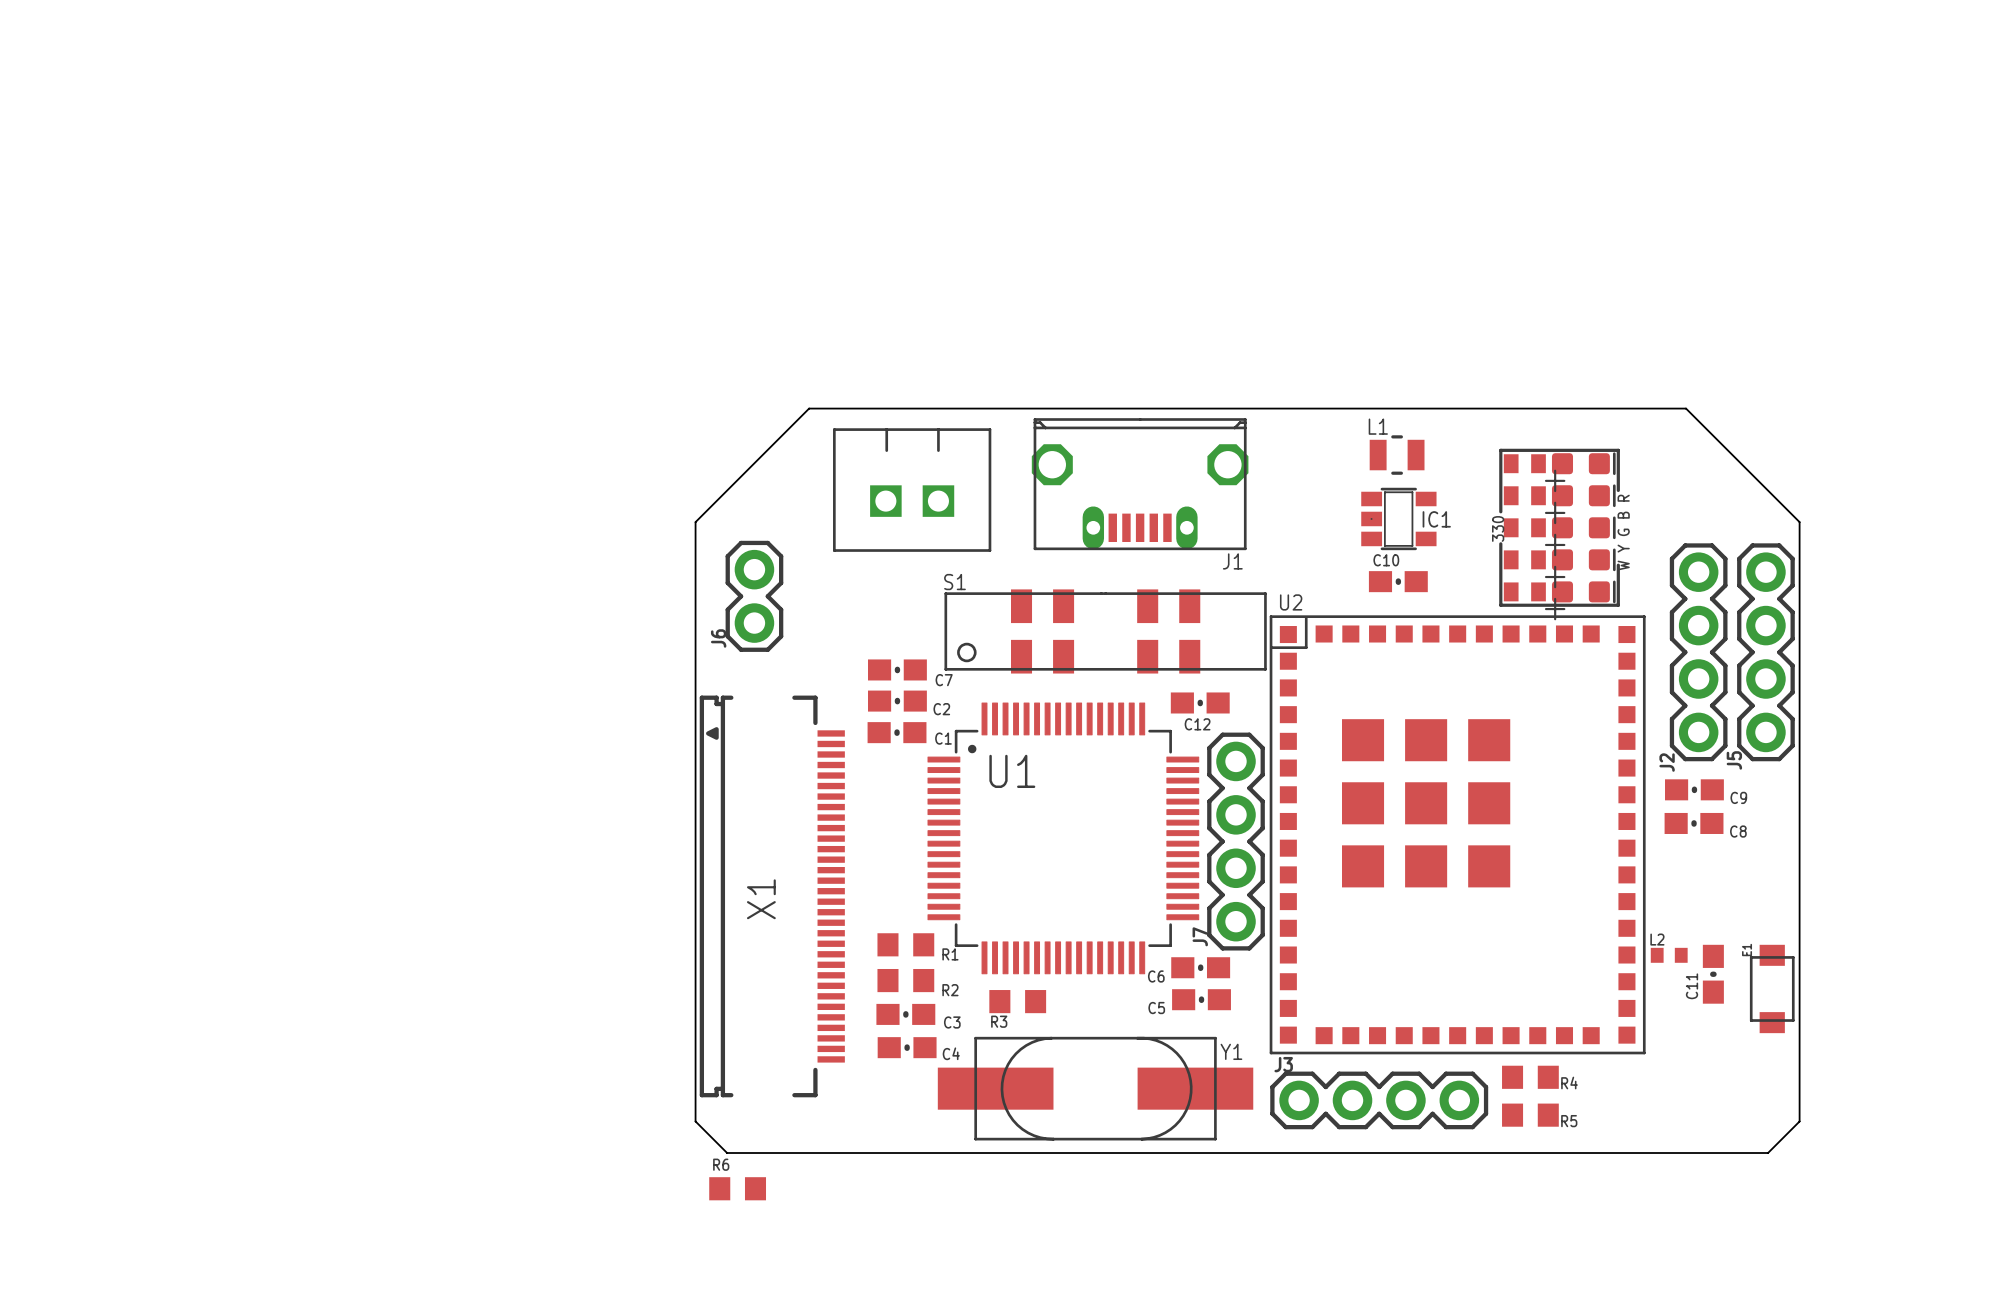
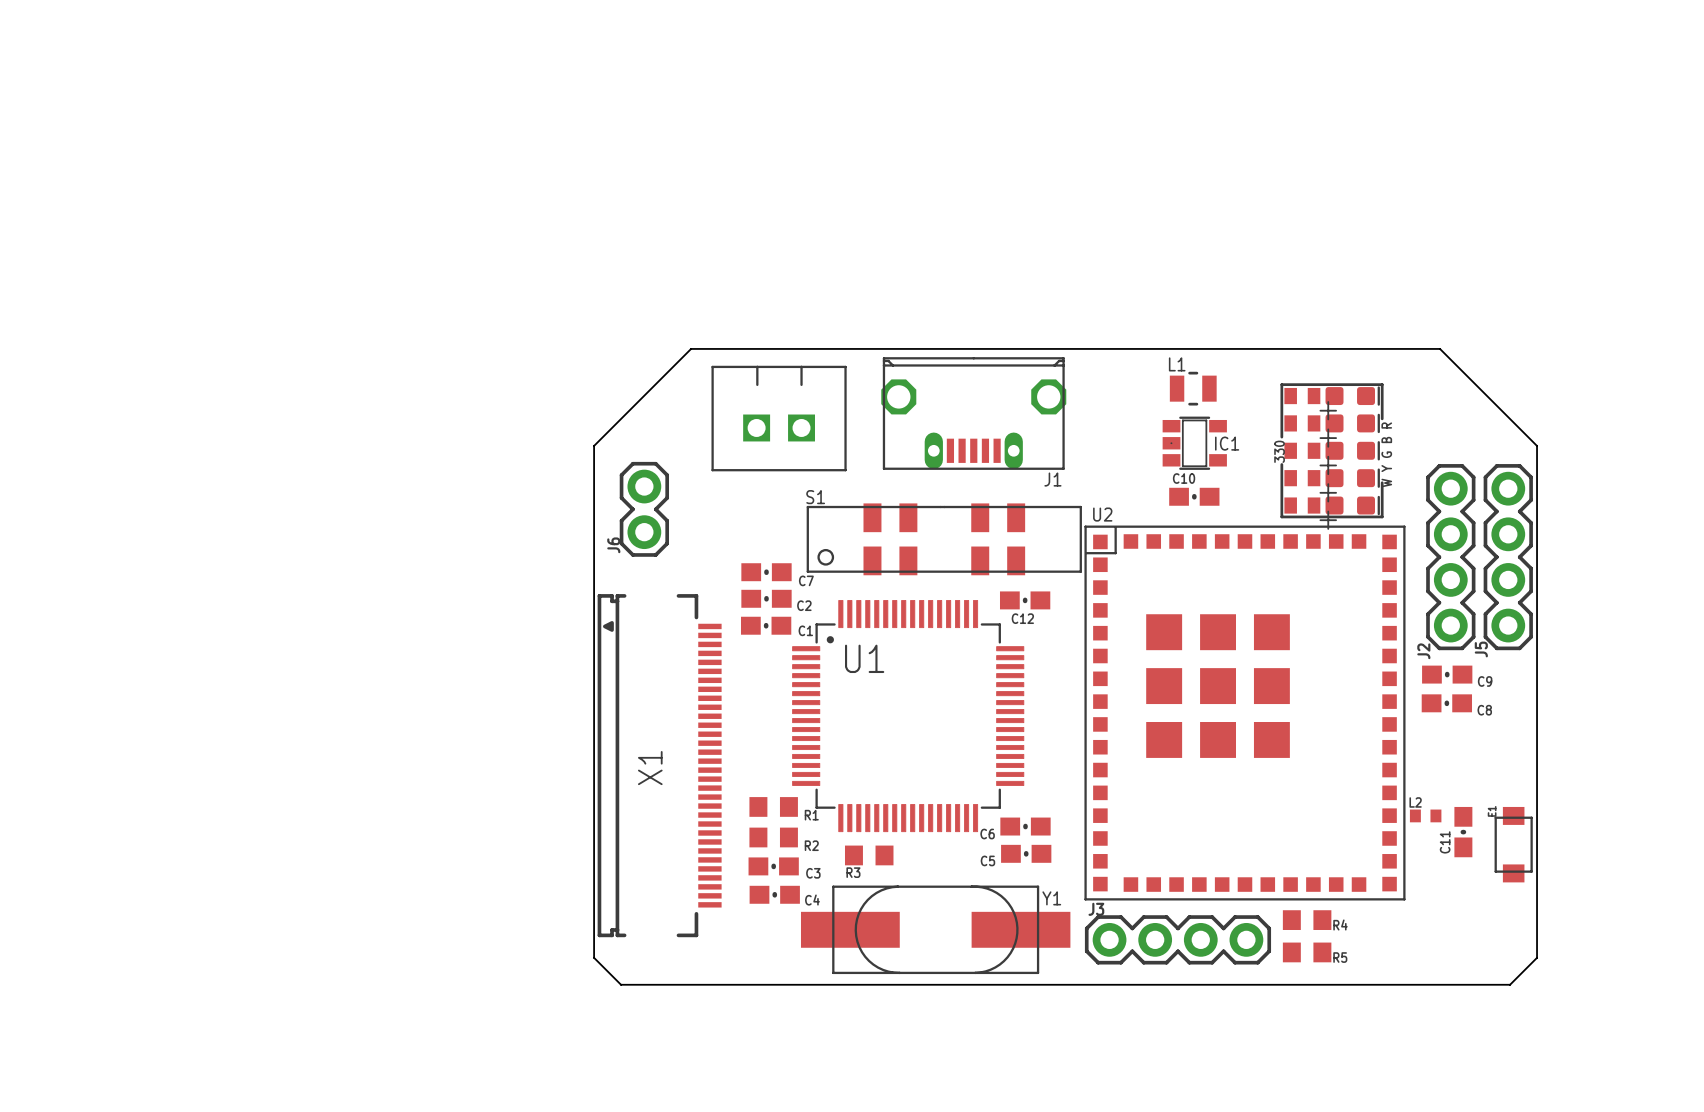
J7: (1236, 841) -> none
R6: (737, 1188) -> none

